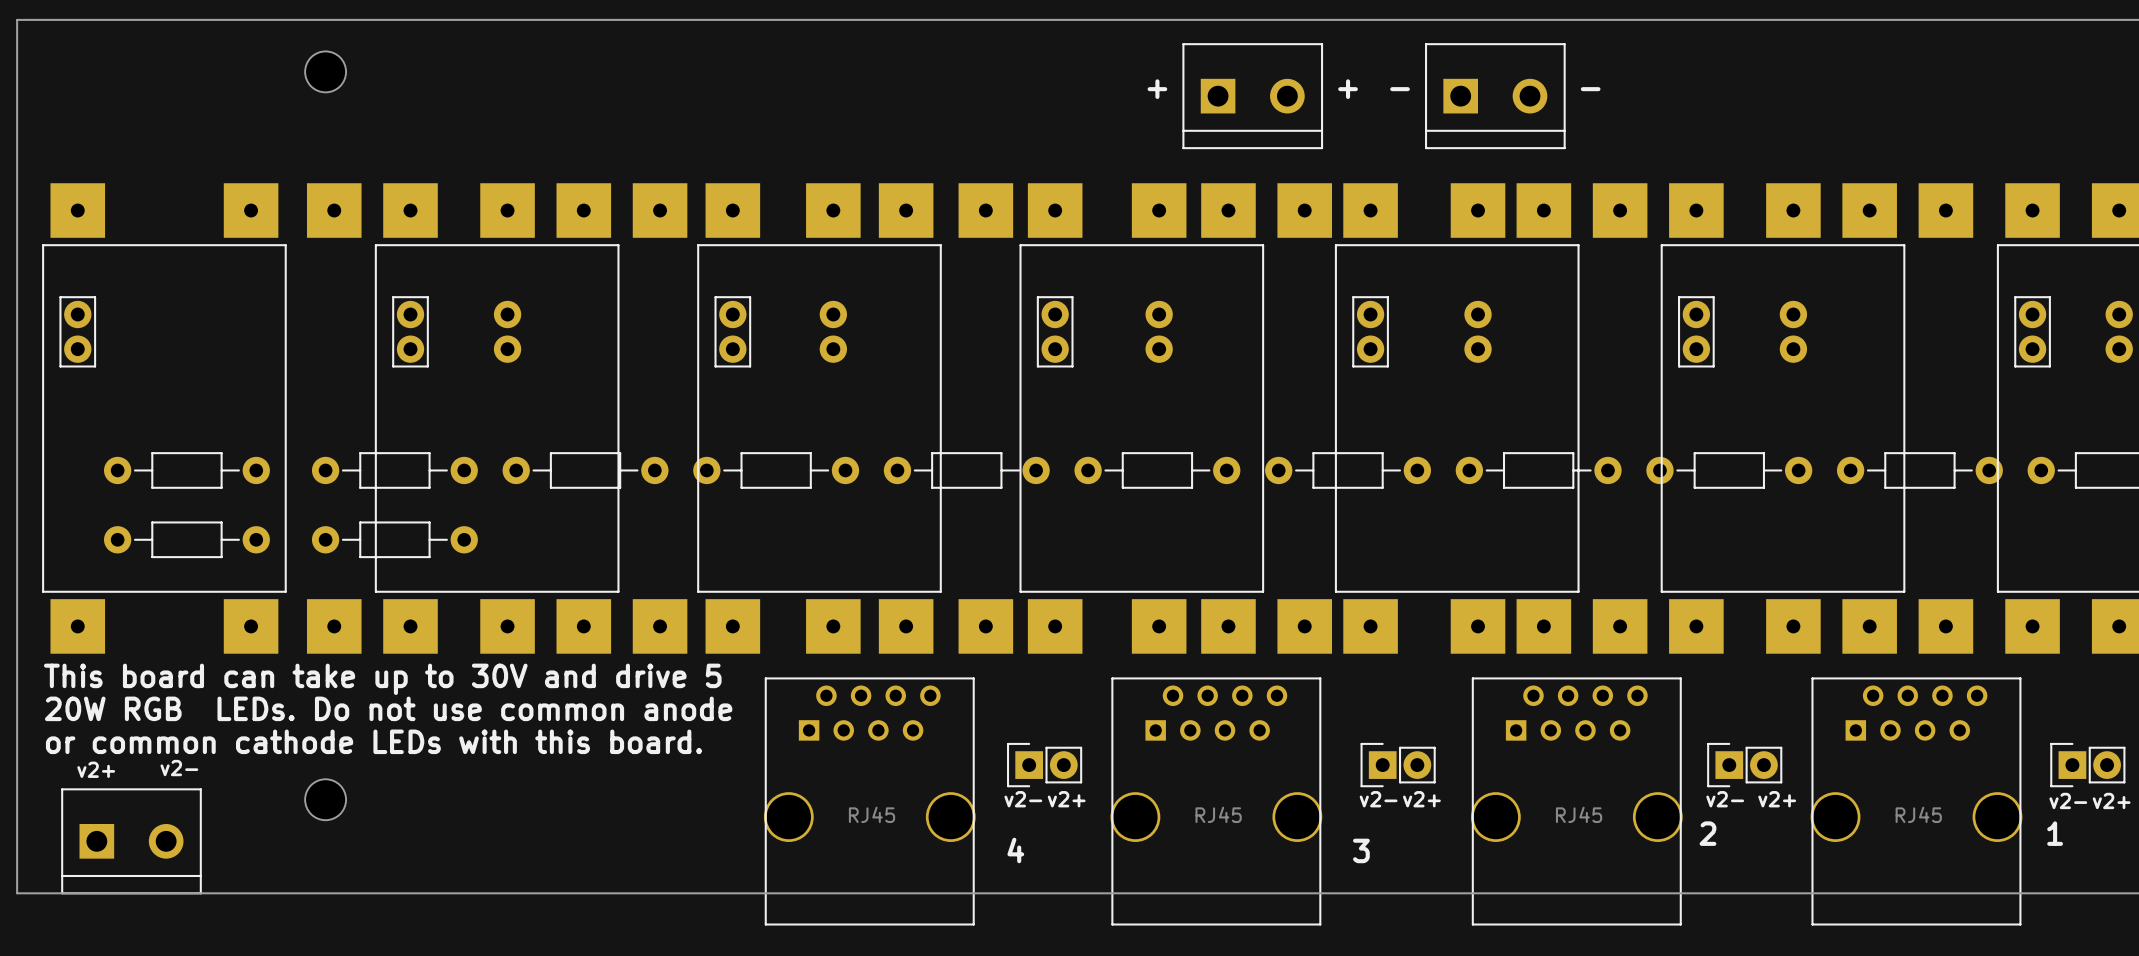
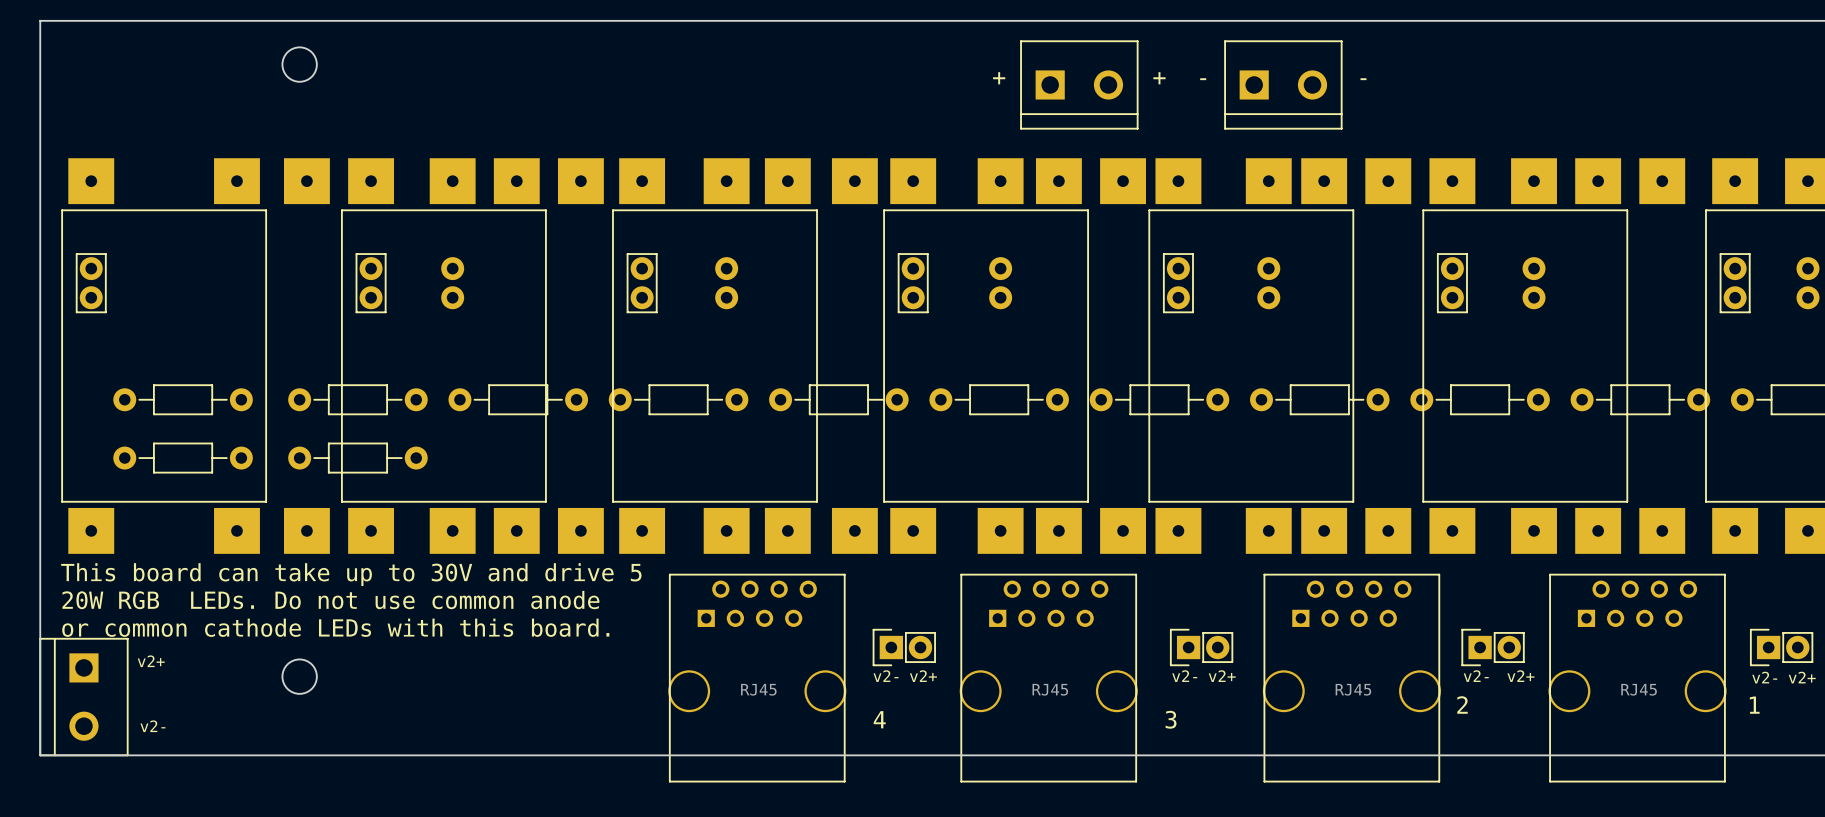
text position: v2- (179, 768) -> v2- (152, 726)
text position: v2+ (96, 769) -> v2+ (151, 661)
part rotation: 0° (131, 841) -> 90° clockwise (83, 697)

